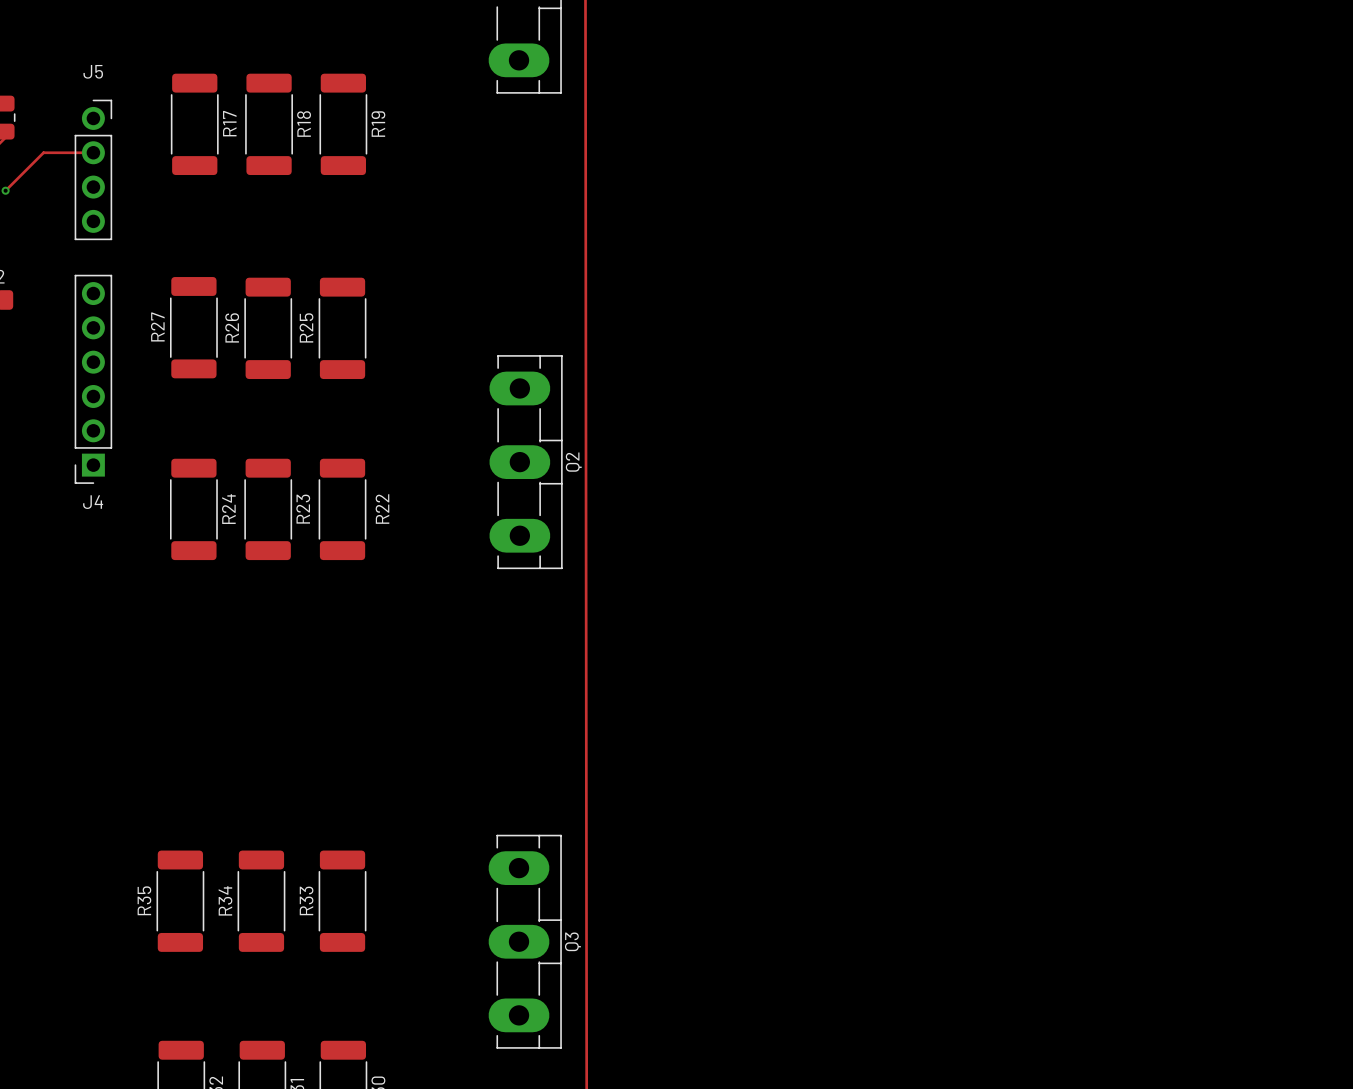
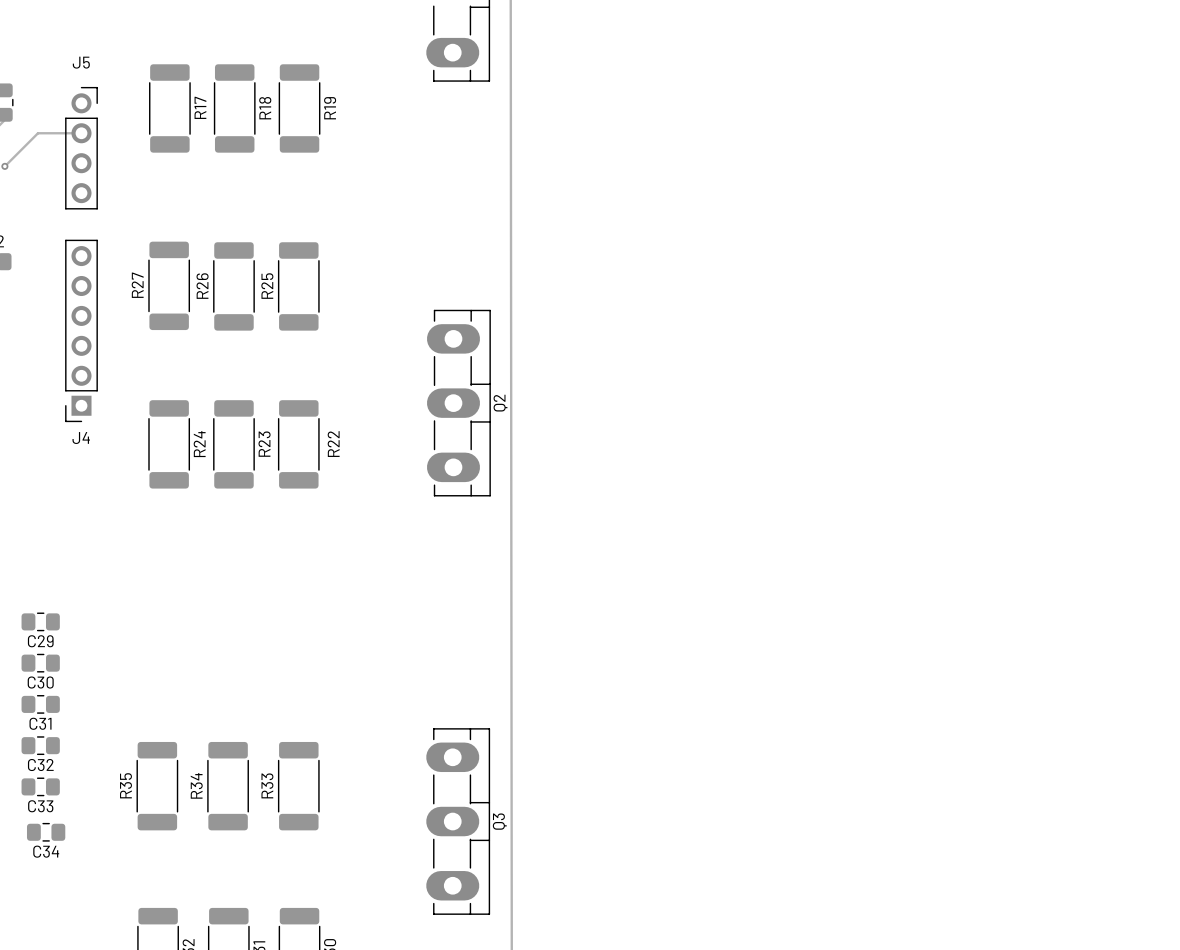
C29: none -> (40, 621)
C30: none -> (40, 663)
C31: none -> (40, 704)
C32: none -> (40, 745)
C33: none -> (40, 786)
C34: none -> (46, 832)

